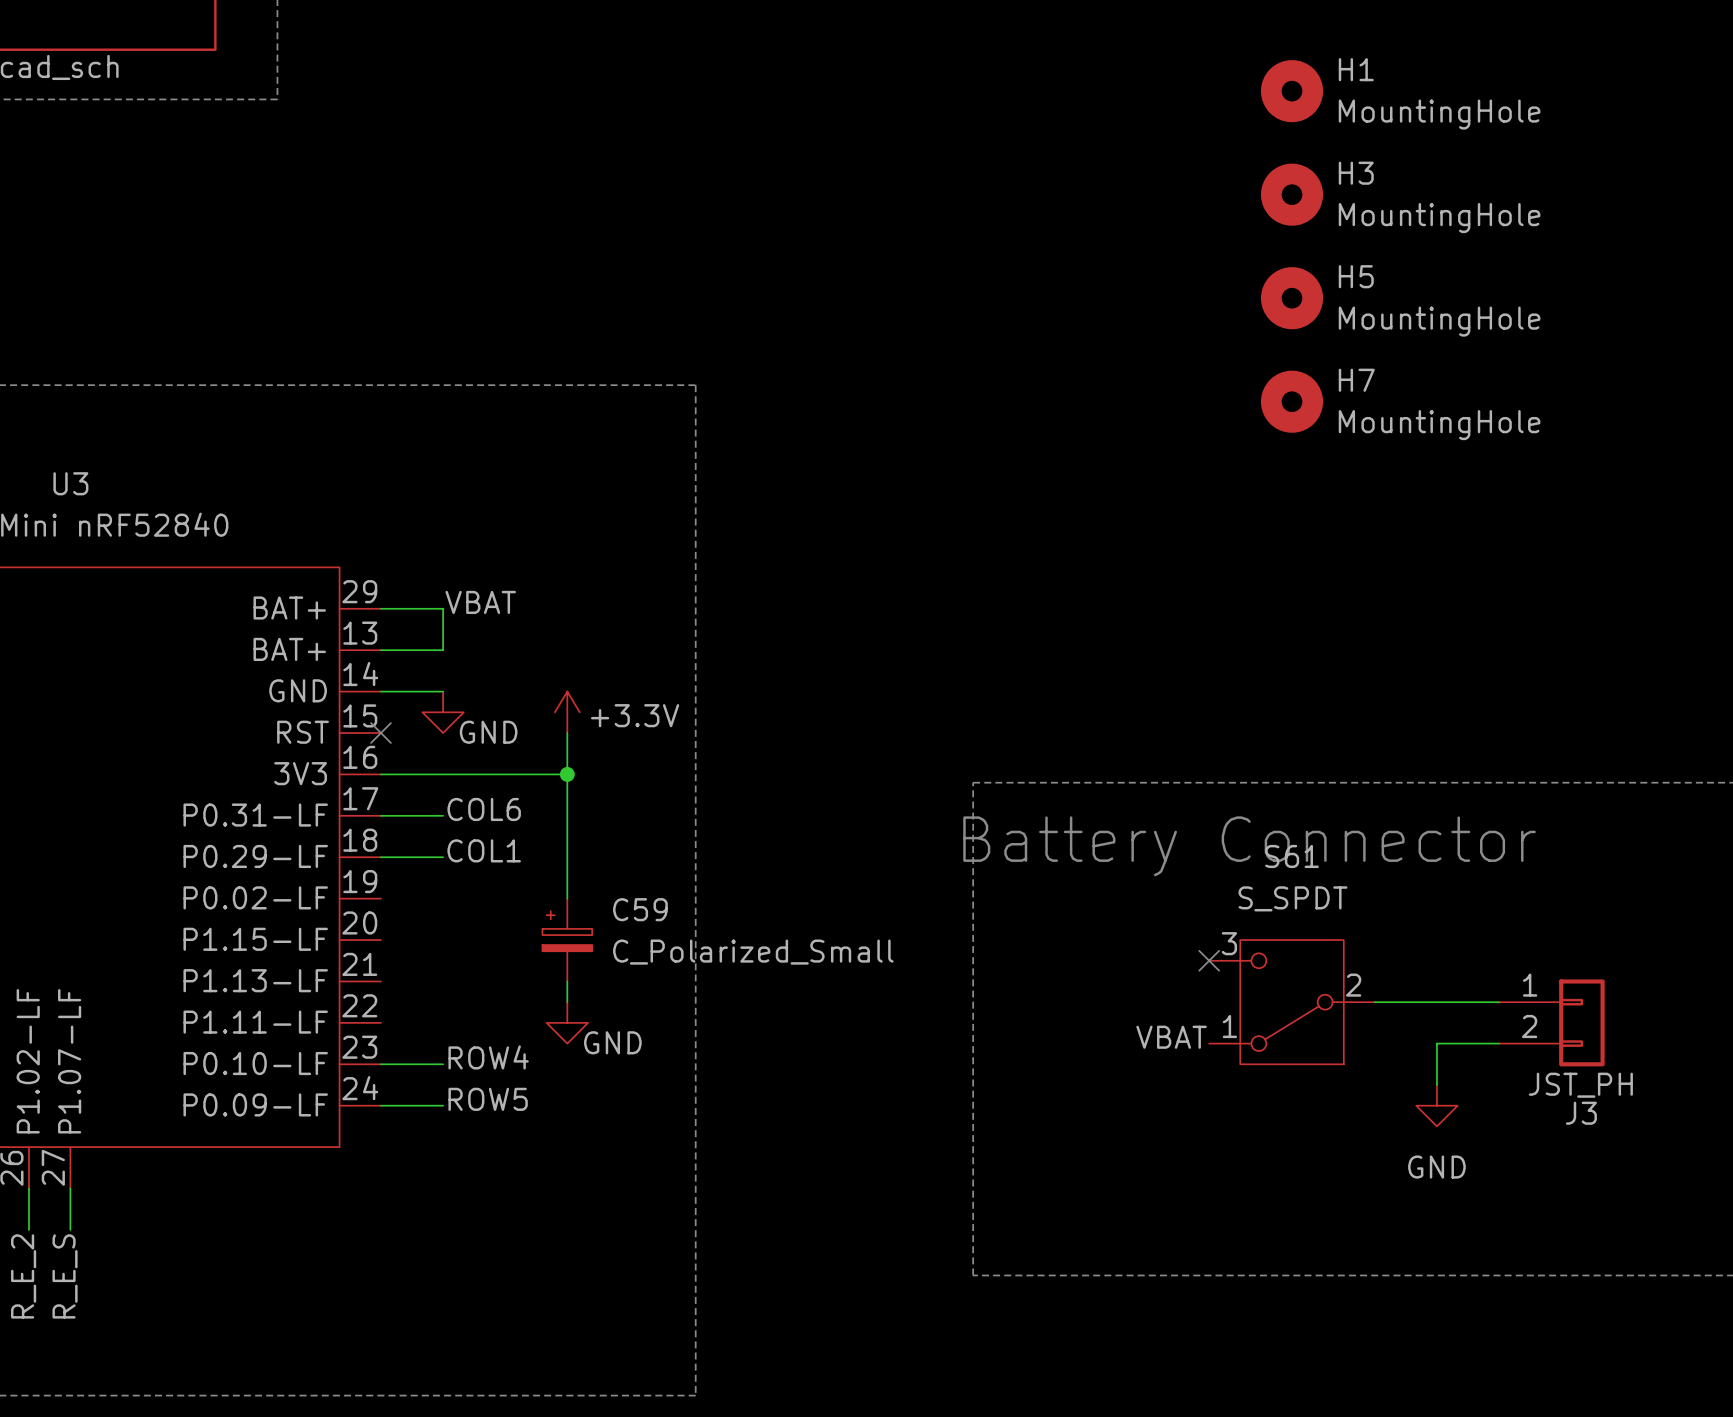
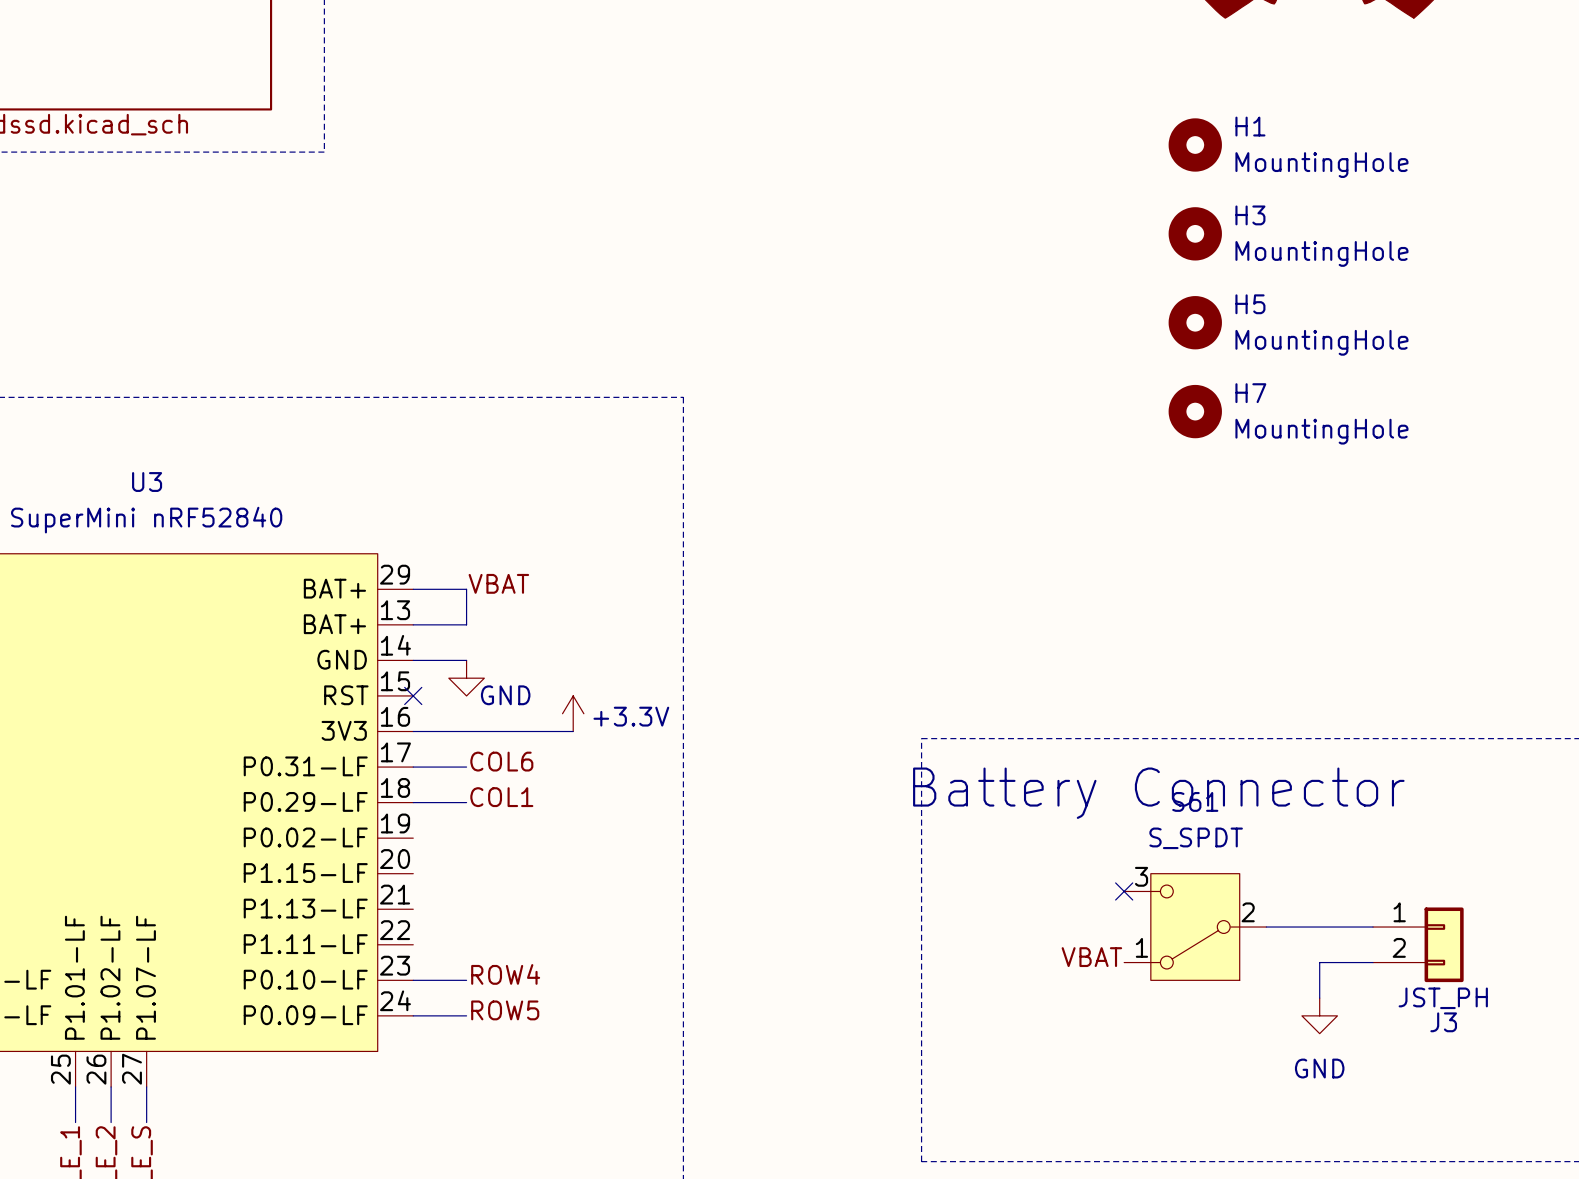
power symbol position: +3.3V (567, 712) -> +3.3V (573, 713)
wire: (567, 733) (567, 898) -> none
junction: (567, 774) -> none
C59: C_Polarized_Small (567, 940) -> none
wire: (567, 981) (567, 1002) -> none
power symbol: GND (567, 1022) -> none

